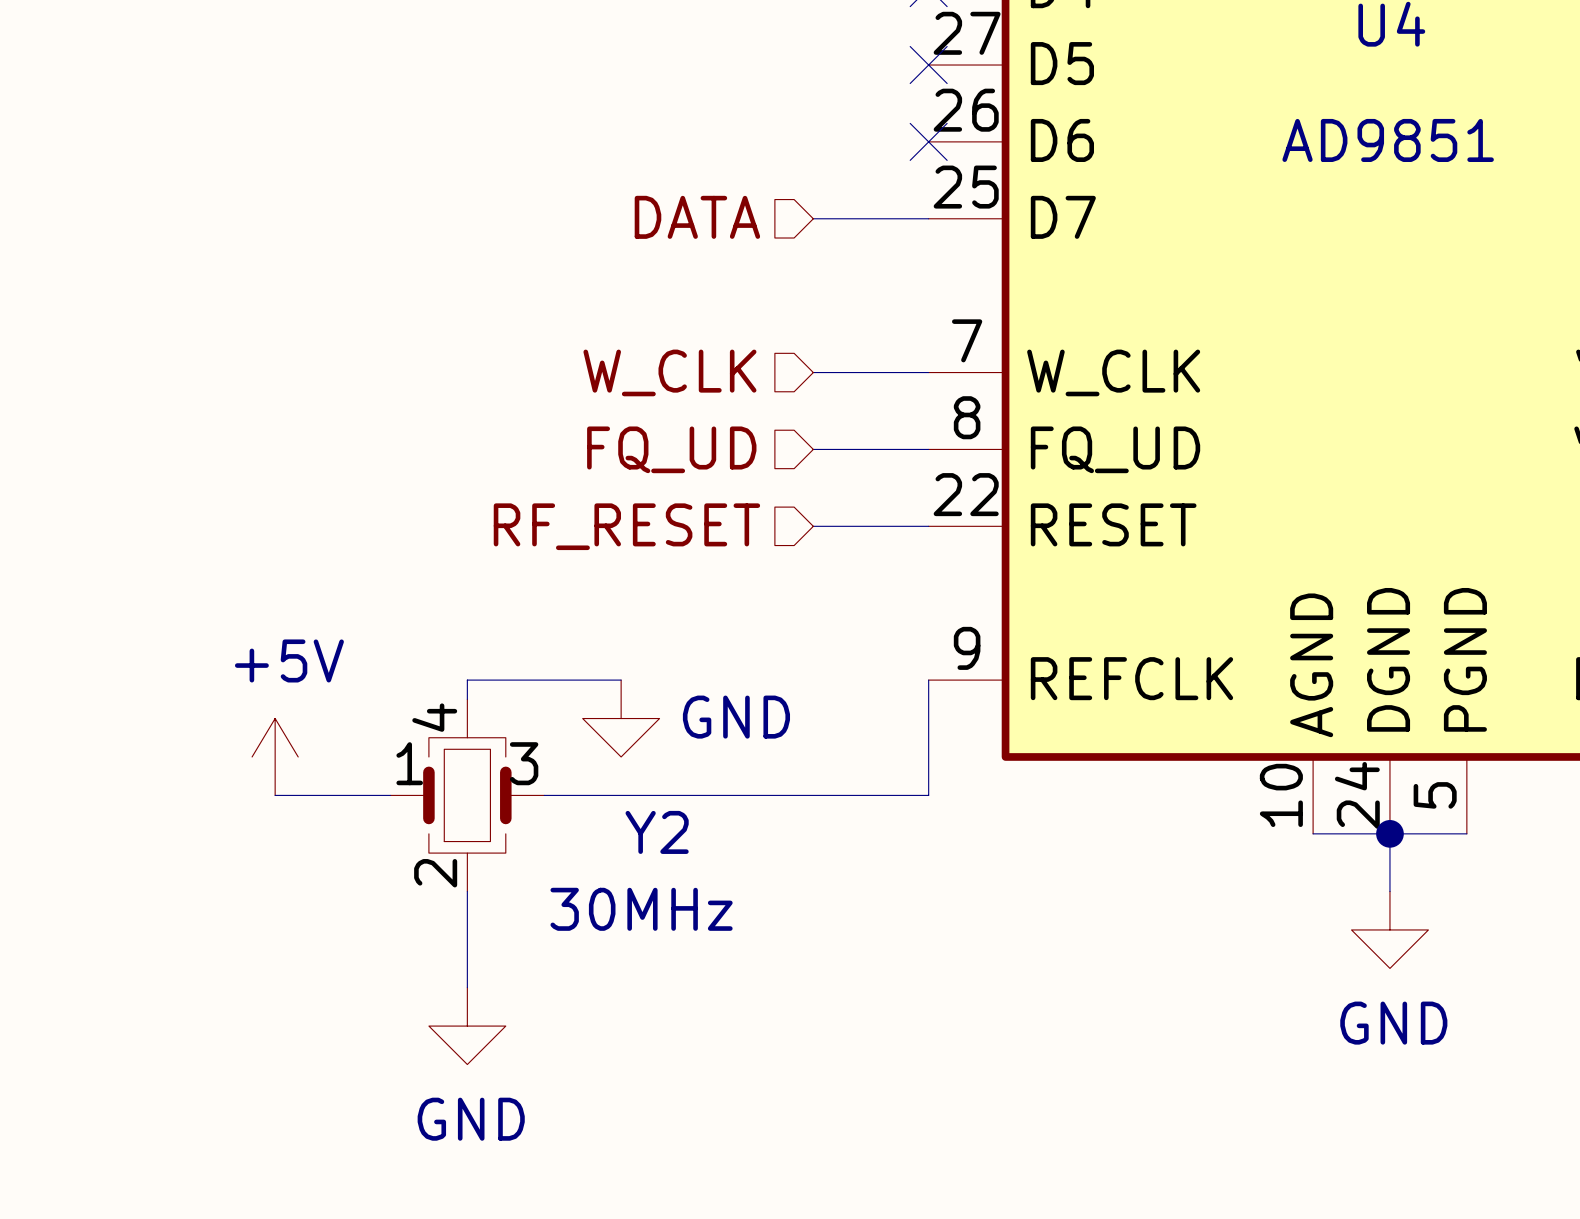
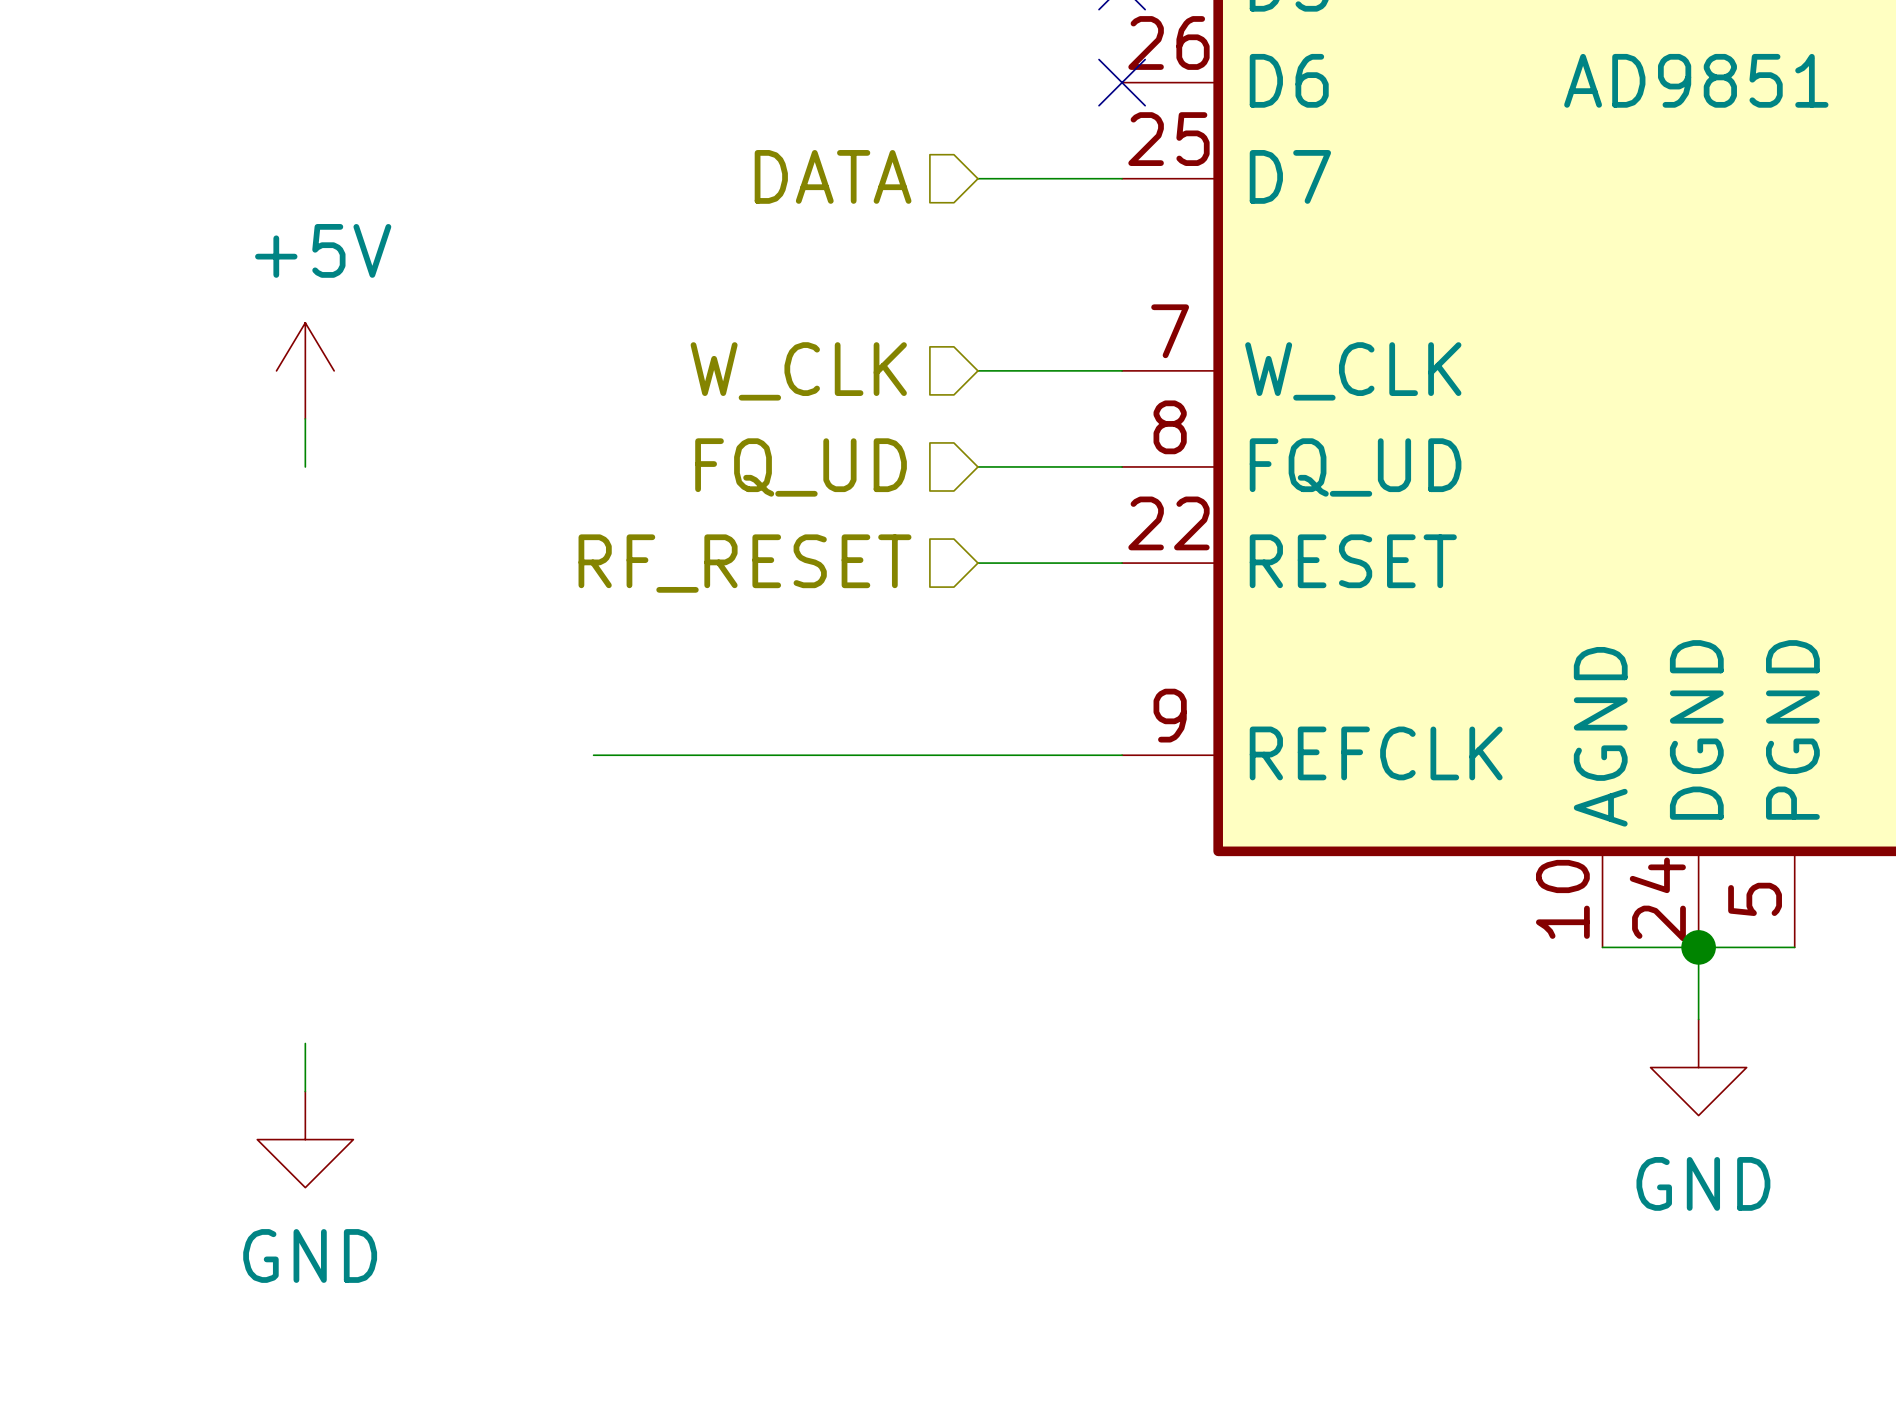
wire: none -> (305, 418) (305, 466)
wire: (505, 680) (467, 680) (467, 699) -> none
wire: (928, 680) (928, 795) (544, 795) -> (1122, 755) (737, 755)
power symbol: GND (621, 718) -> none
power symbol position: +5V (275, 756) -> +5V (305, 370)
wire: (275, 795) (390, 795) -> none
Y2: 30MHz (467, 795) -> none
wire: (467, 891) (467, 987) -> none
wire: none -> (305, 1043) (305, 1091)
power symbol position: GND (467, 1026) -> GND (305, 1139)

